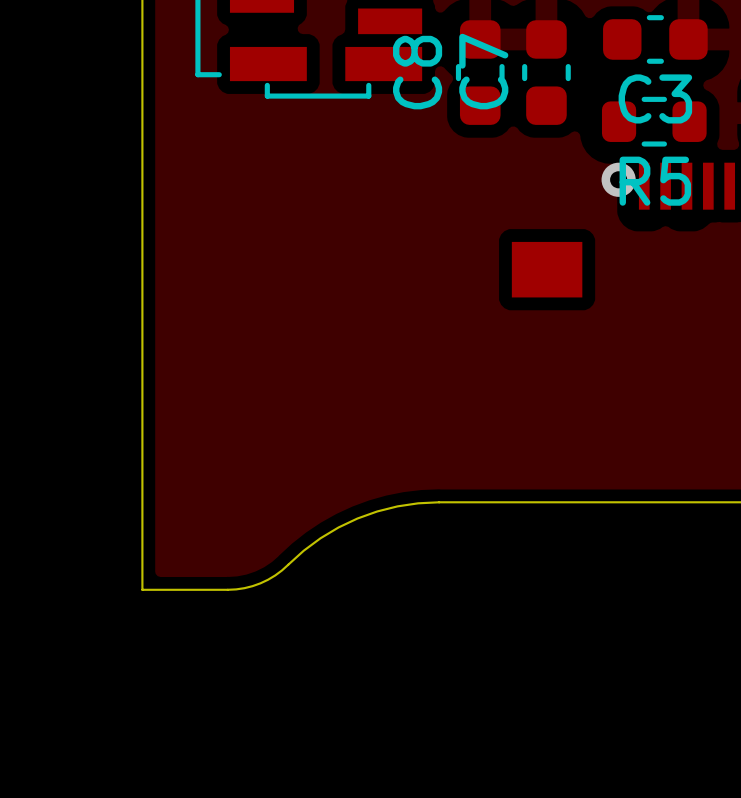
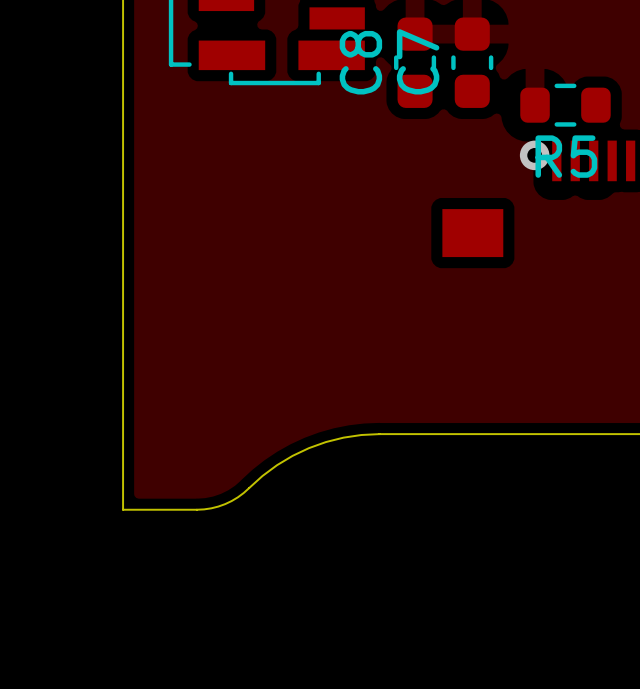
C3: (655, 39) -> none

